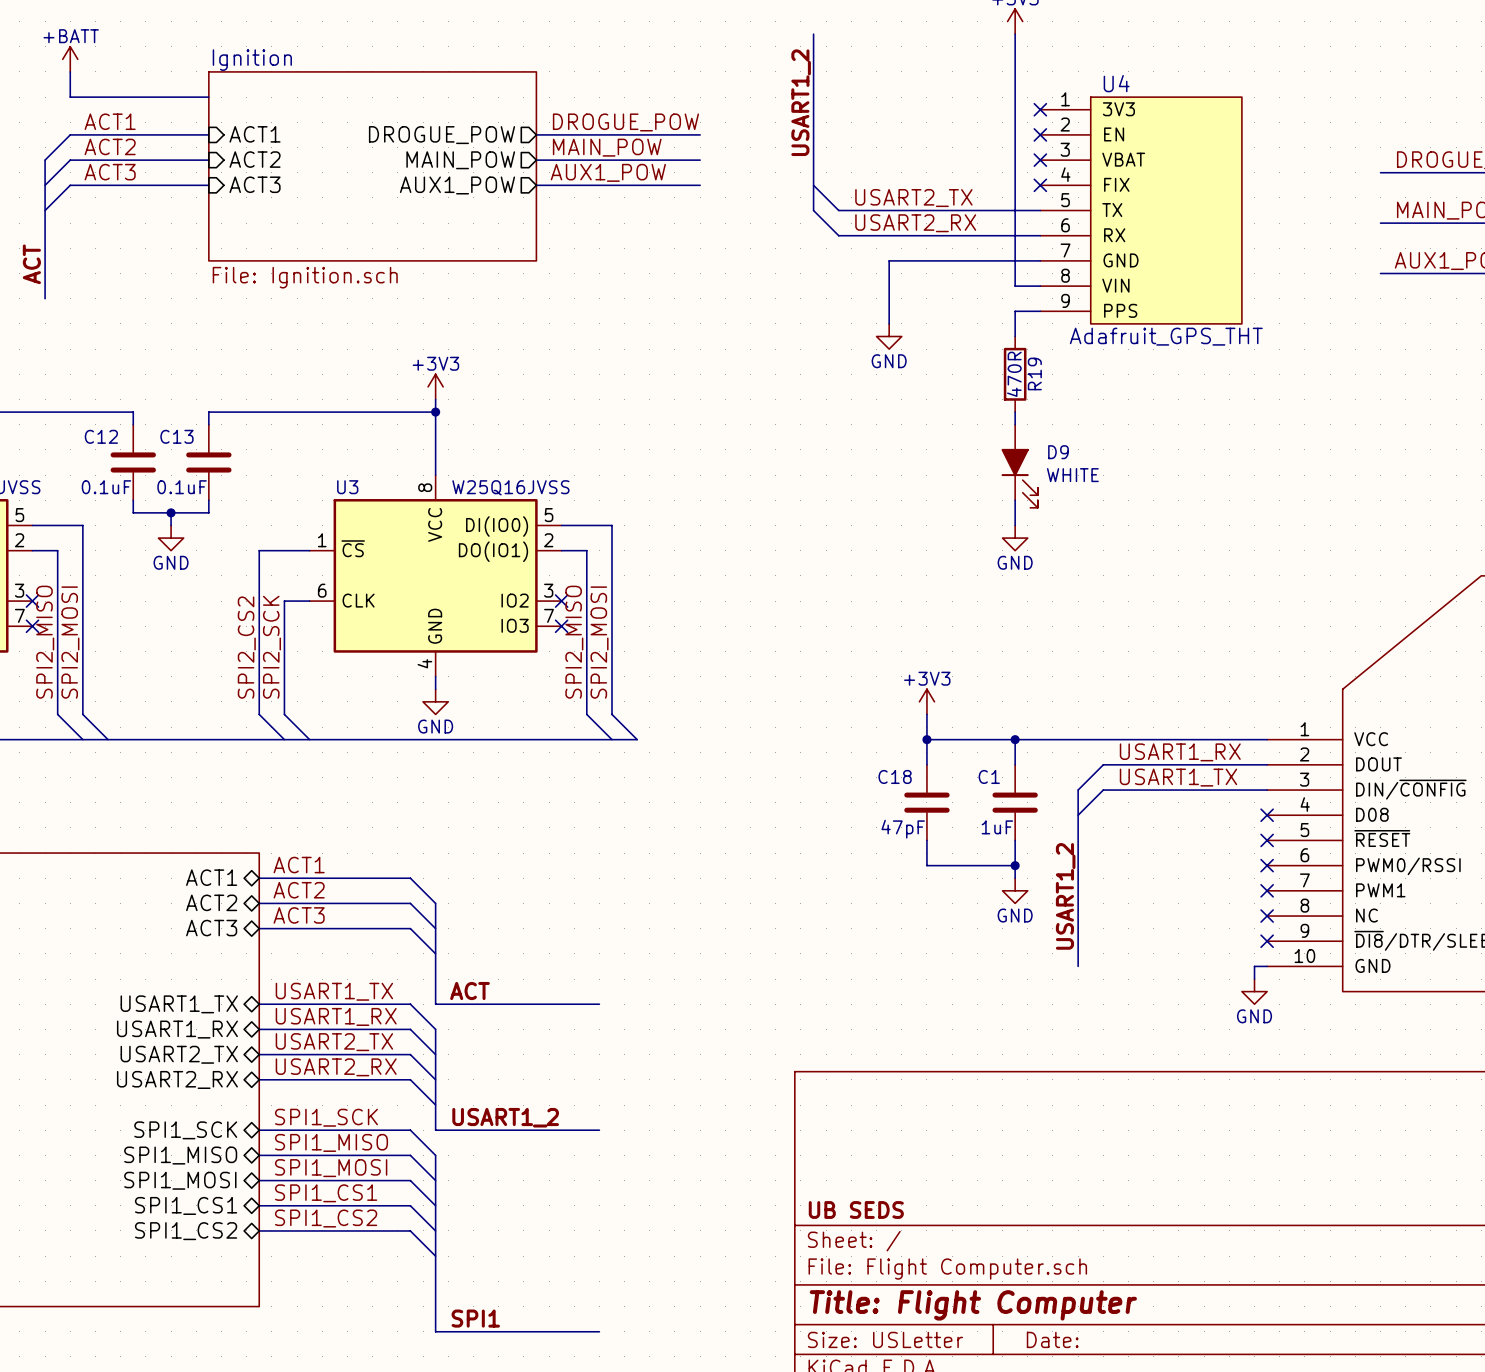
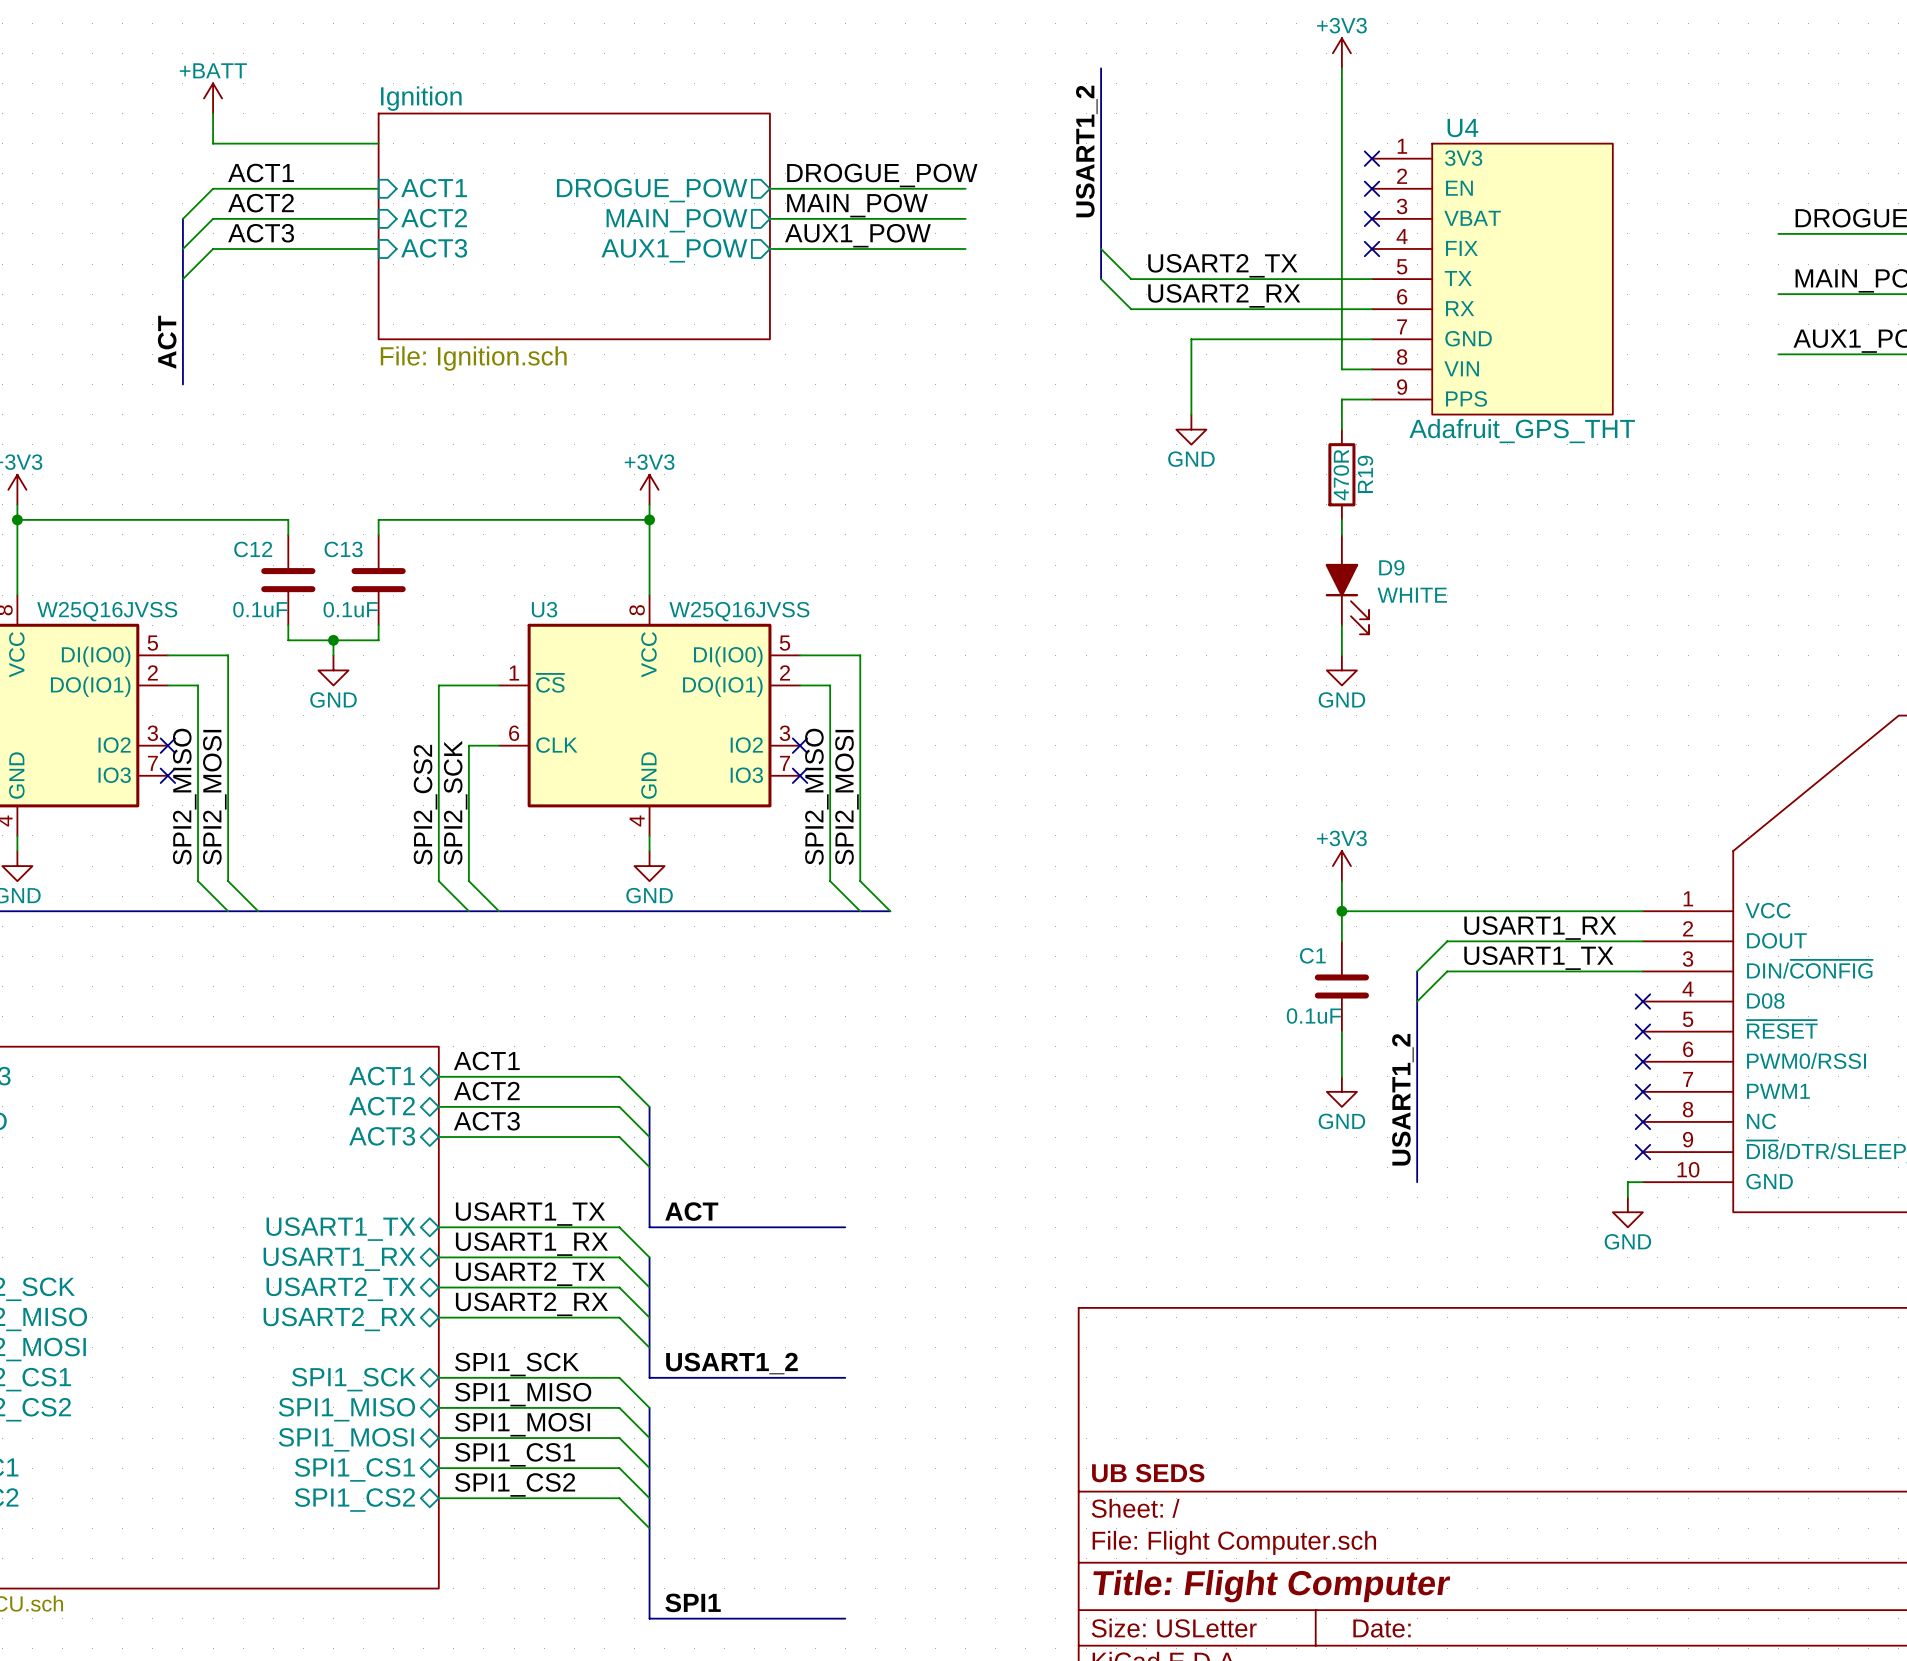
power symbol position: +3V3 (926, 701) -> +3V3 (1341, 866)
wire: (926, 714) (926, 764) -> none
wire: (926, 739) (1015, 739) -> (1341, 881) (1341, 911)
junction: (926, 739) -> none
C18: 47pF (926, 802) -> none
C1 value: 1uF (997, 827) -> 0.1uF (1313, 1016)
wire: (926, 840) (926, 865) (1015, 865) -> none
junction: (1015, 865) -> none

